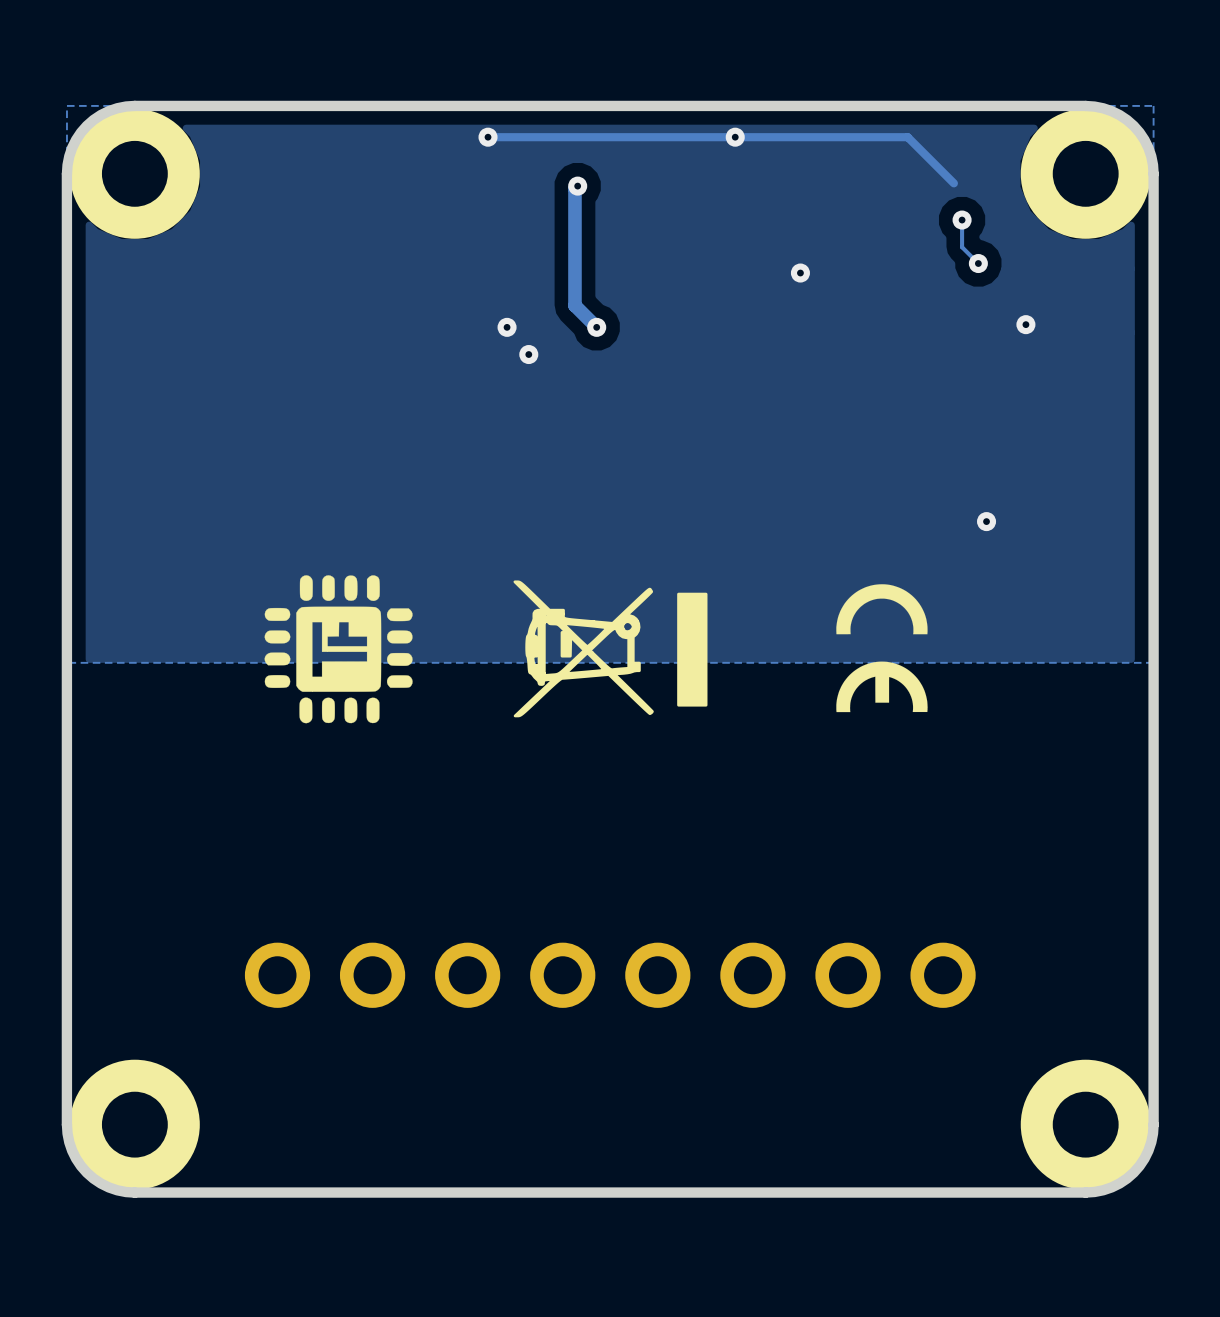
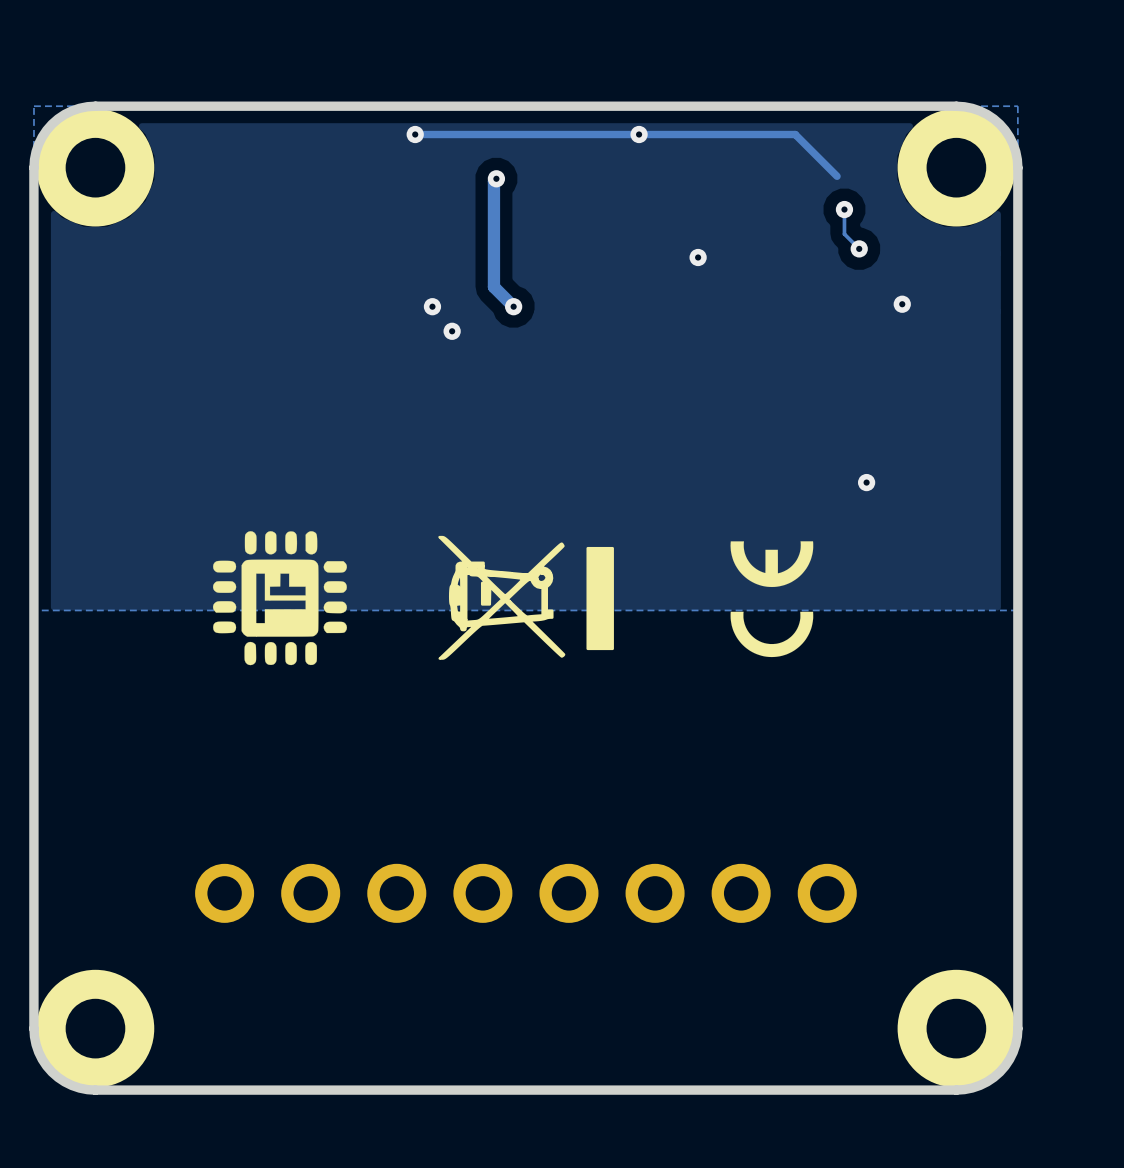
drawing shape: [836, 584, 928, 713] -> [730, 541, 814, 658]

